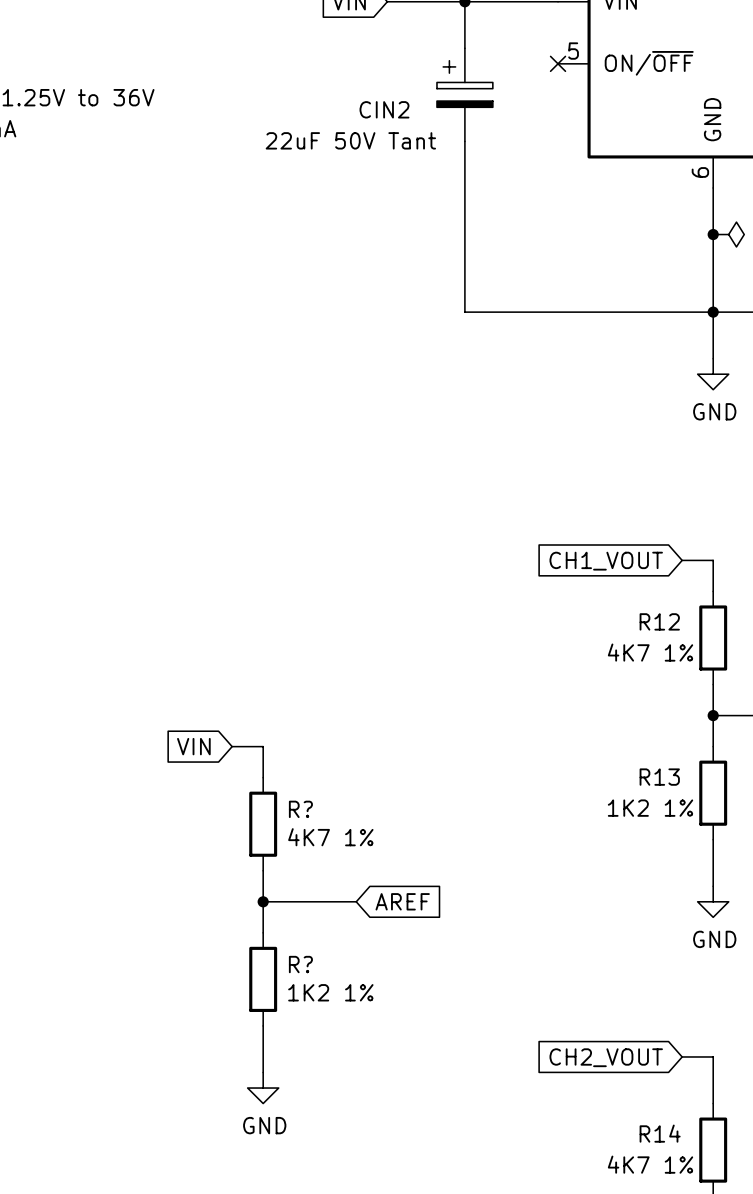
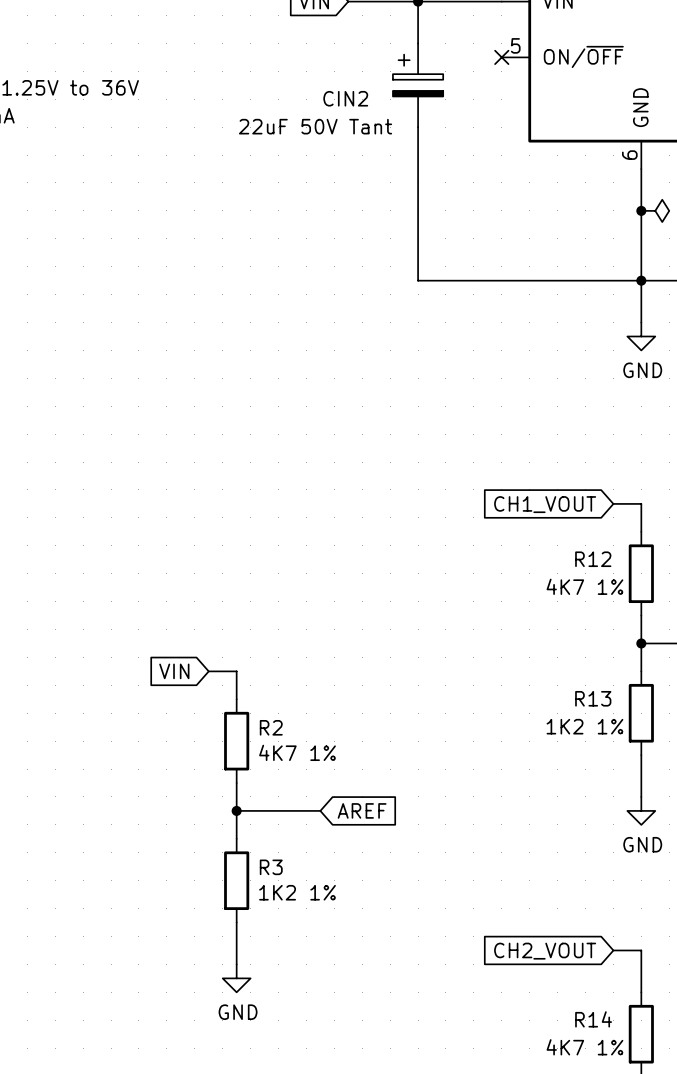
R? name: R? (300, 809) -> R2 (271, 727)
R? name: R? (300, 964) -> R3 (271, 867)

